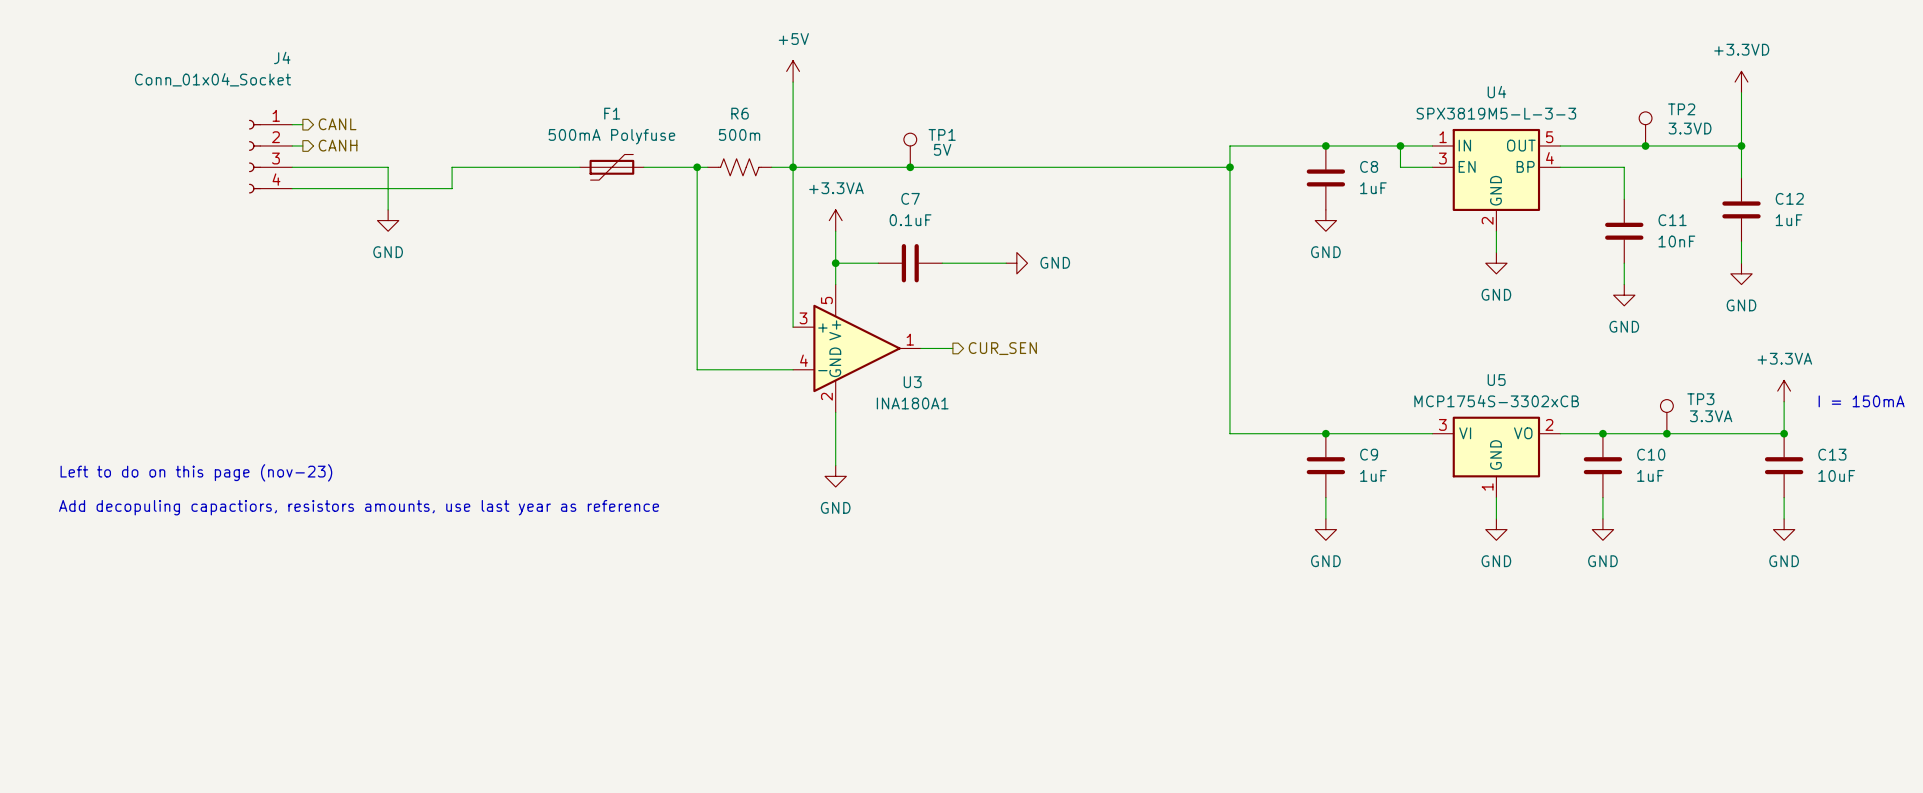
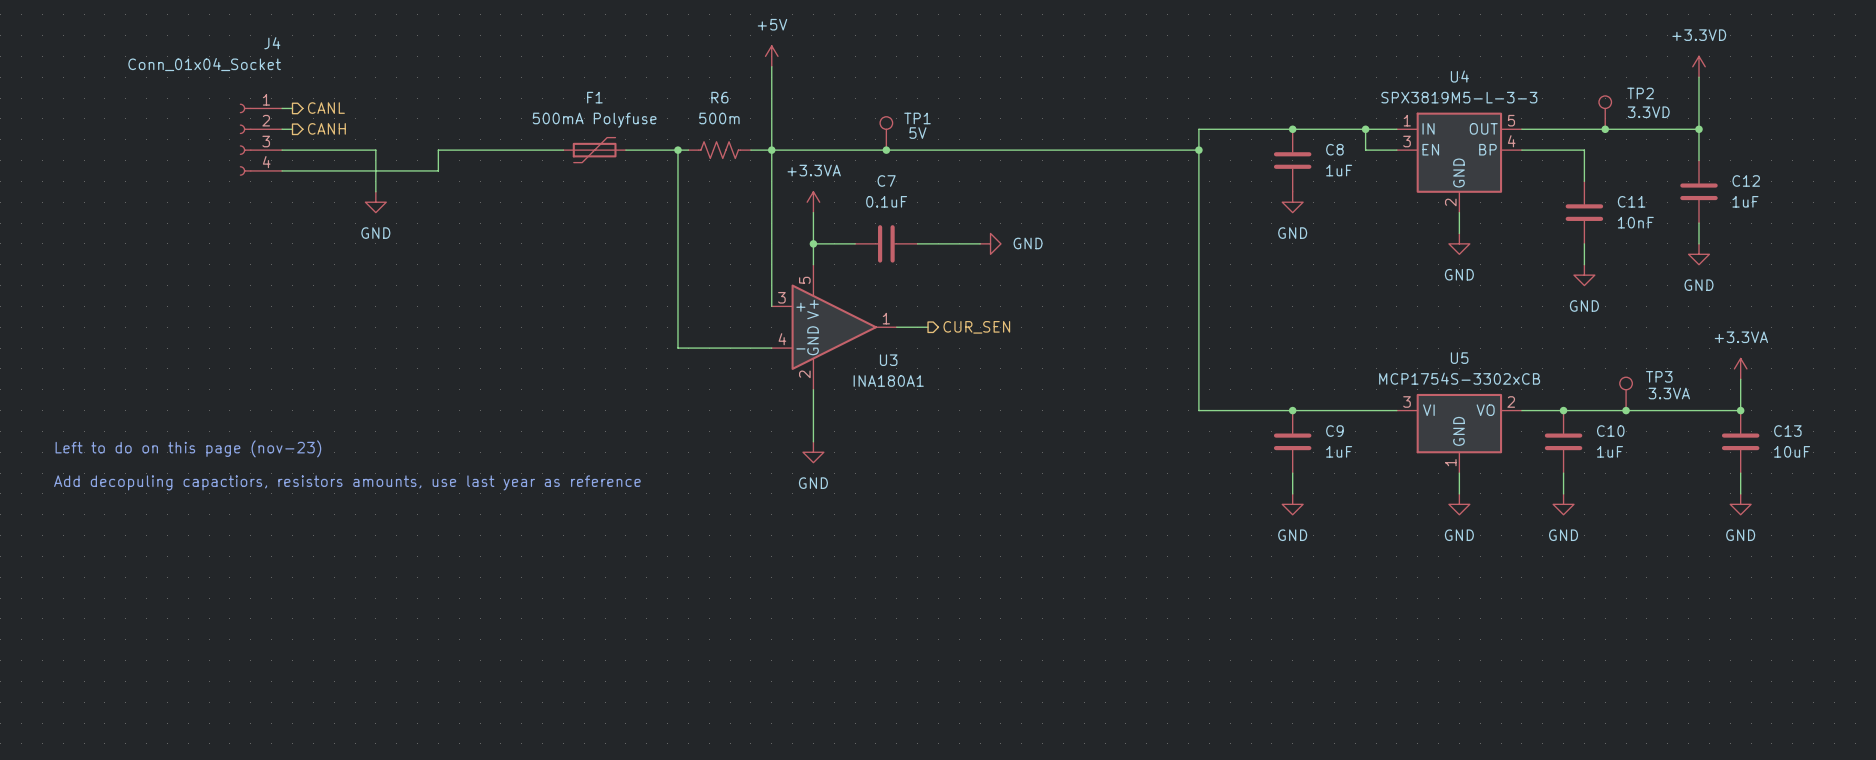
text: I = 150mA (1861, 401) -> none

